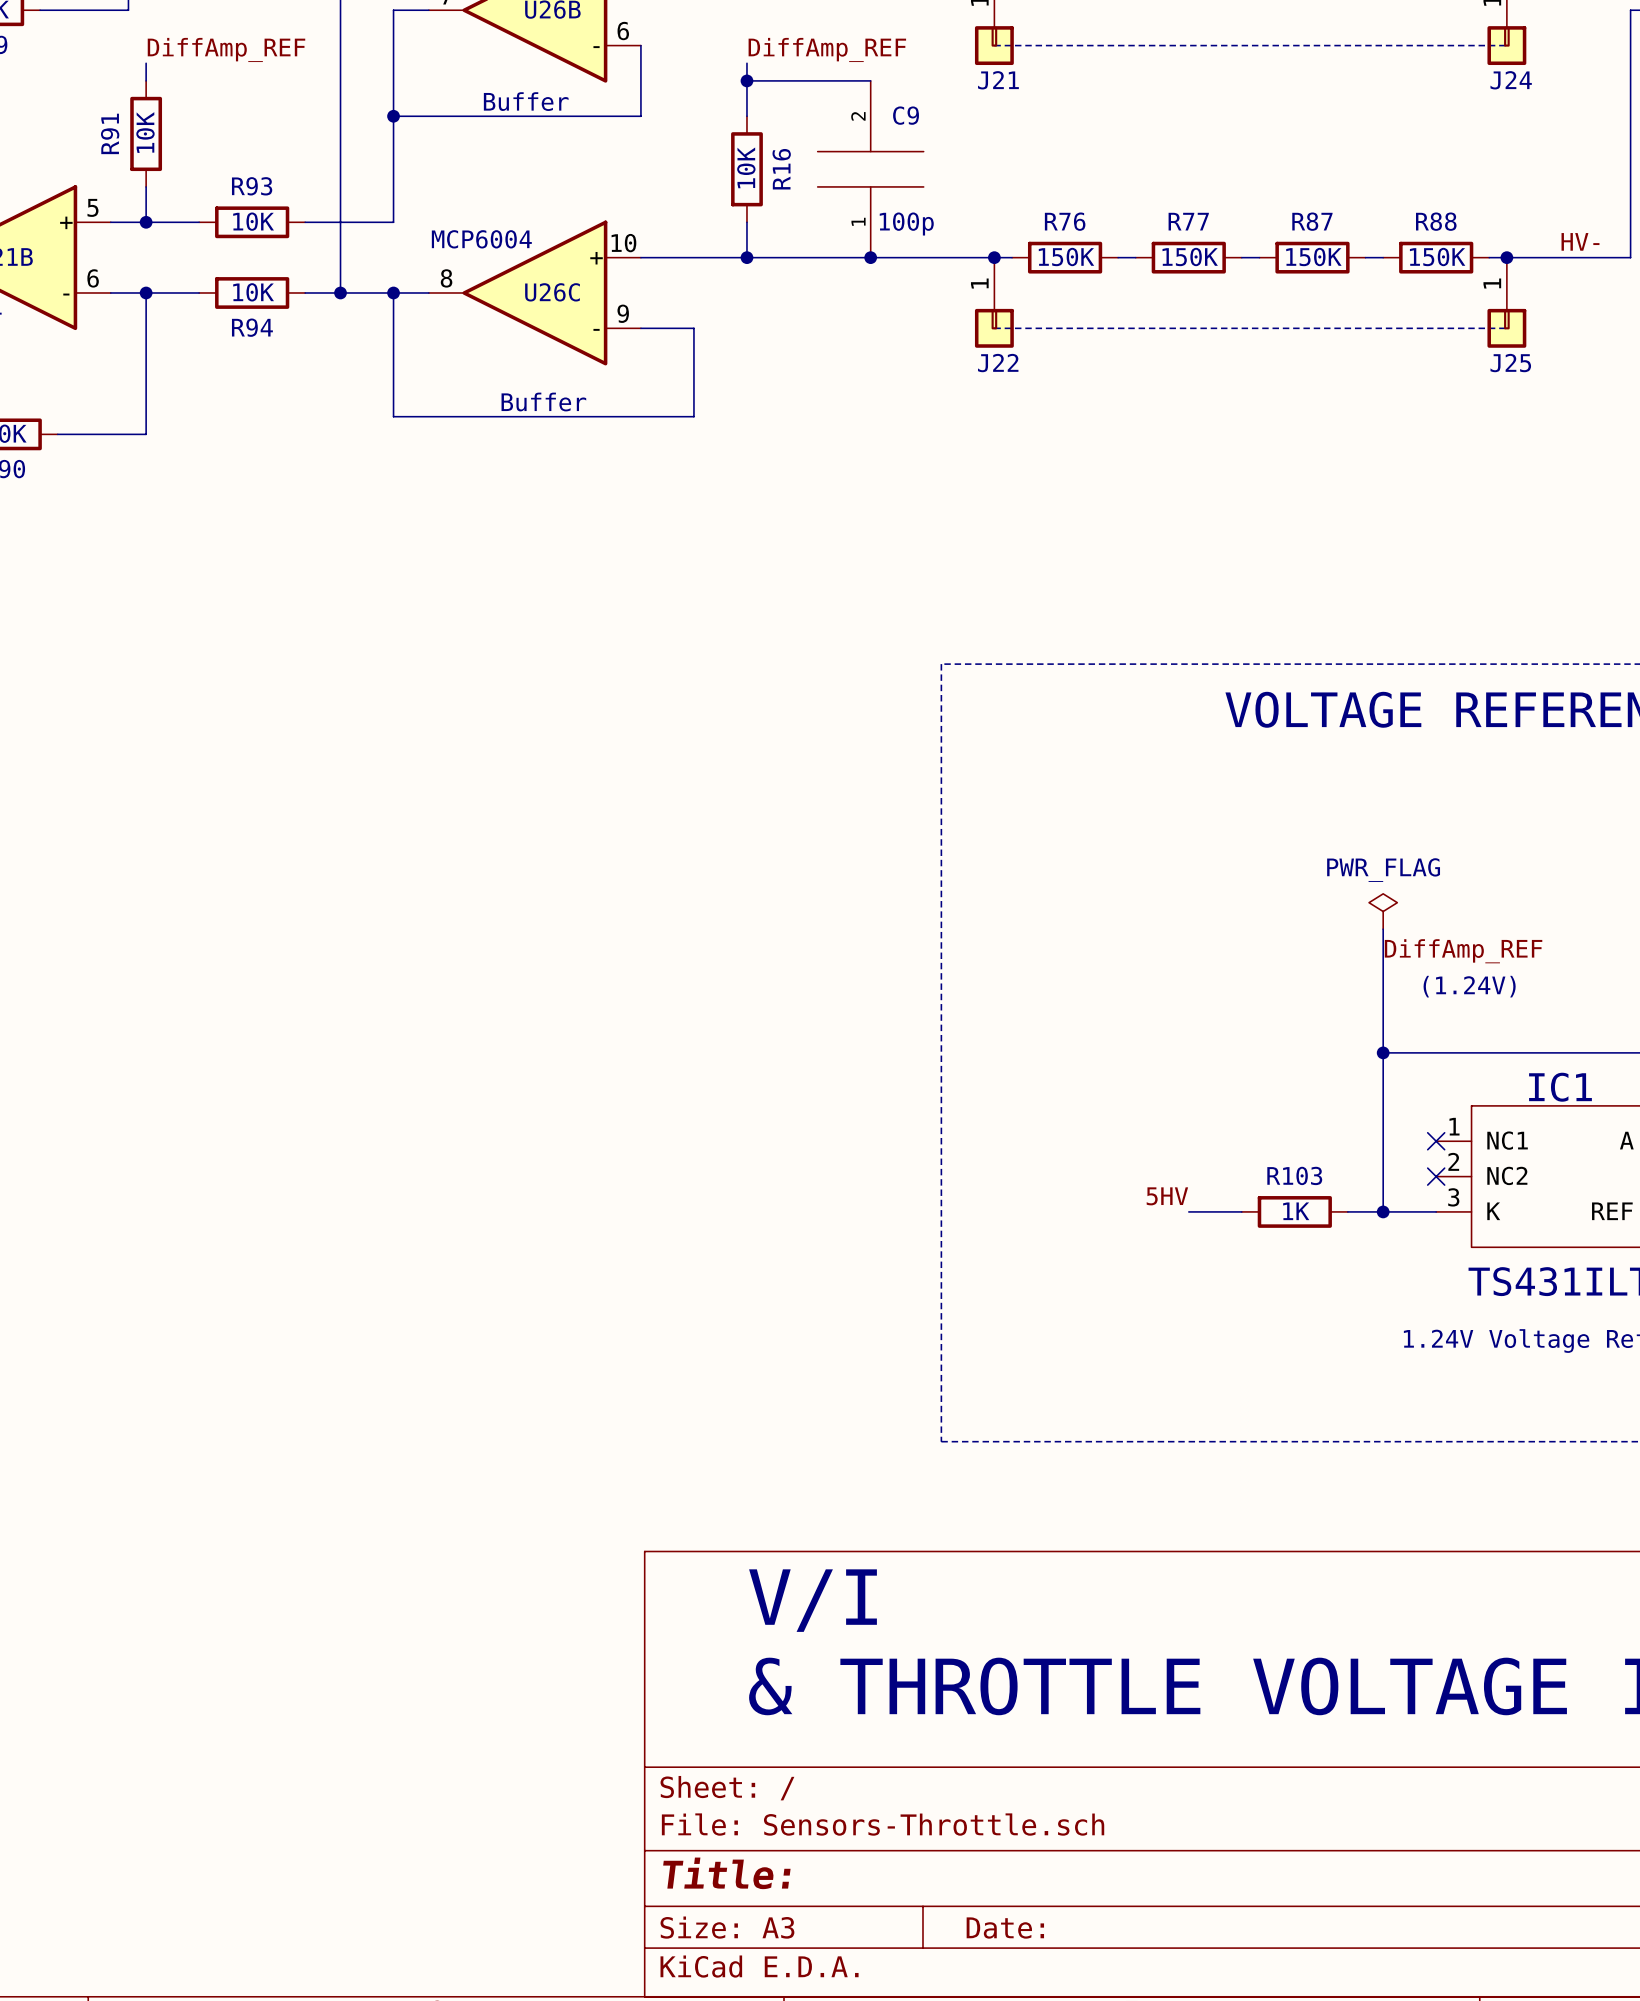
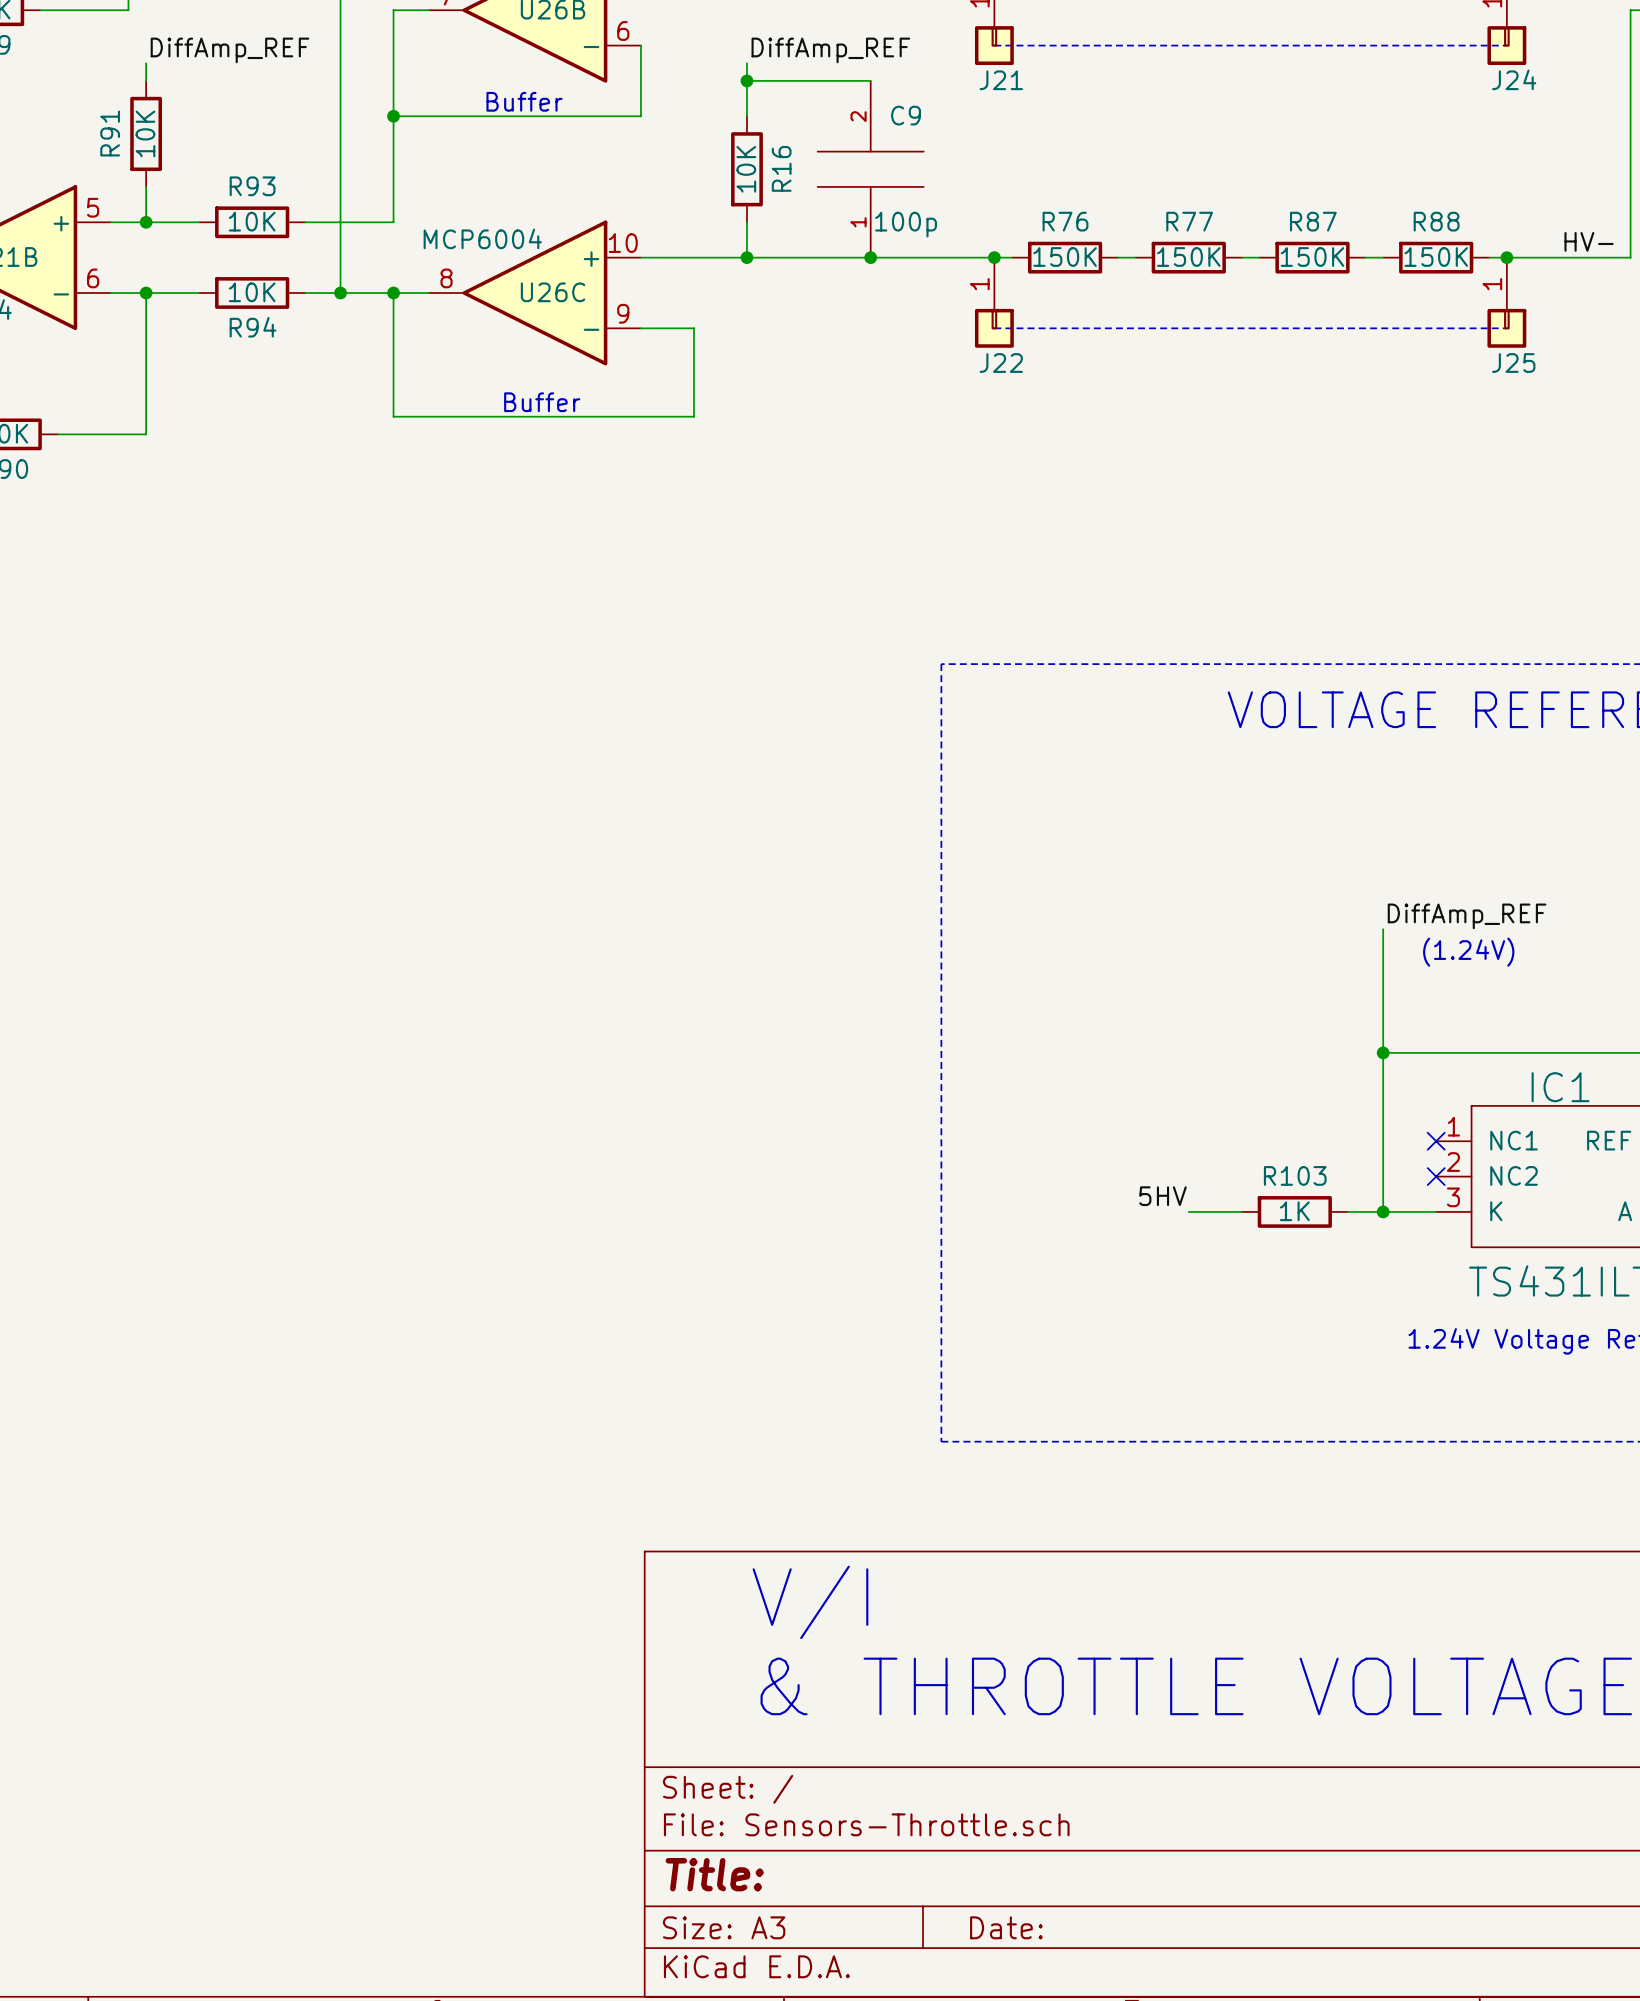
power symbol: PWR_FLAG (1383, 911) -> none
label position: DiffAmp_REF (1463, 951) -> DiffAmp_REF (1467, 916)
text position: (1.24V) (1469, 986) -> (1.24V) (1468, 952)
IC1 pin name: A (1626, 1140) -> REF (1609, 1140)
IC1 pin name: REF (1612, 1211) -> A (1625, 1211)

